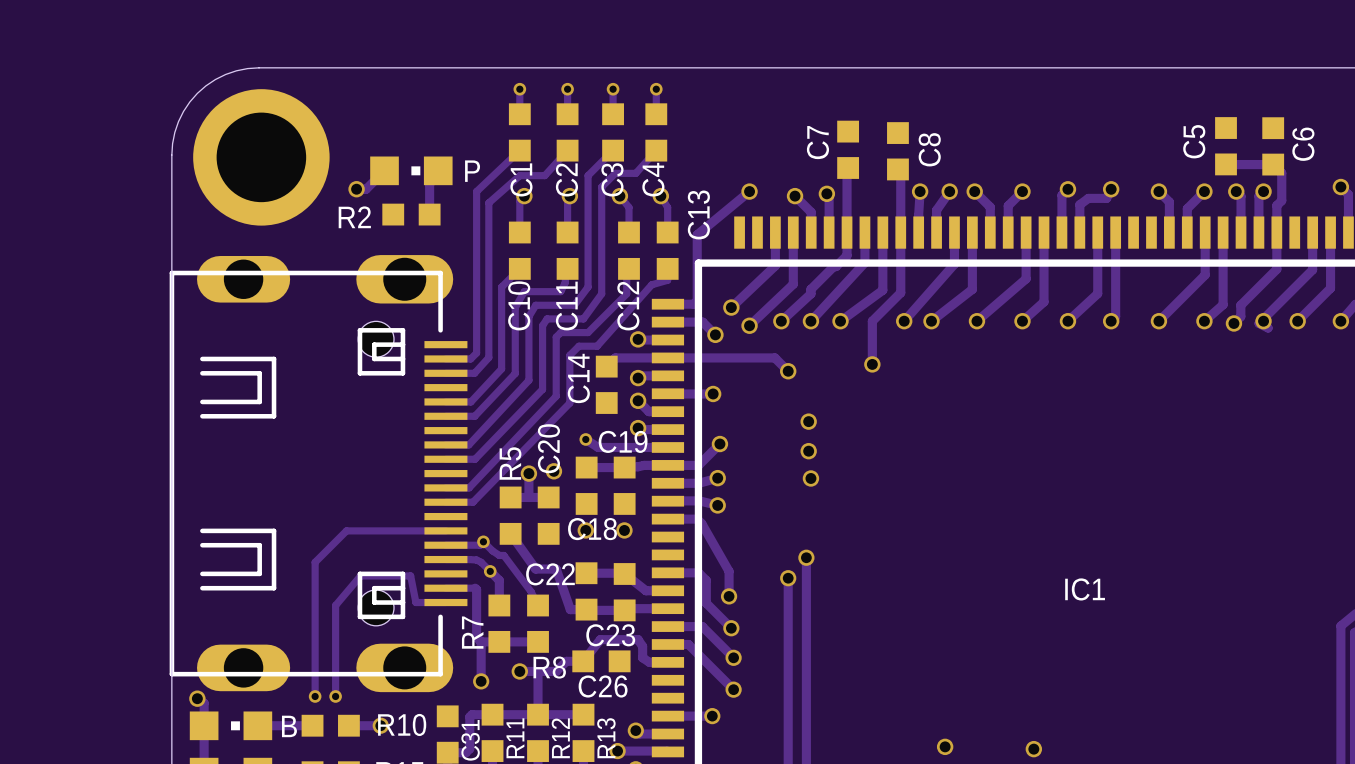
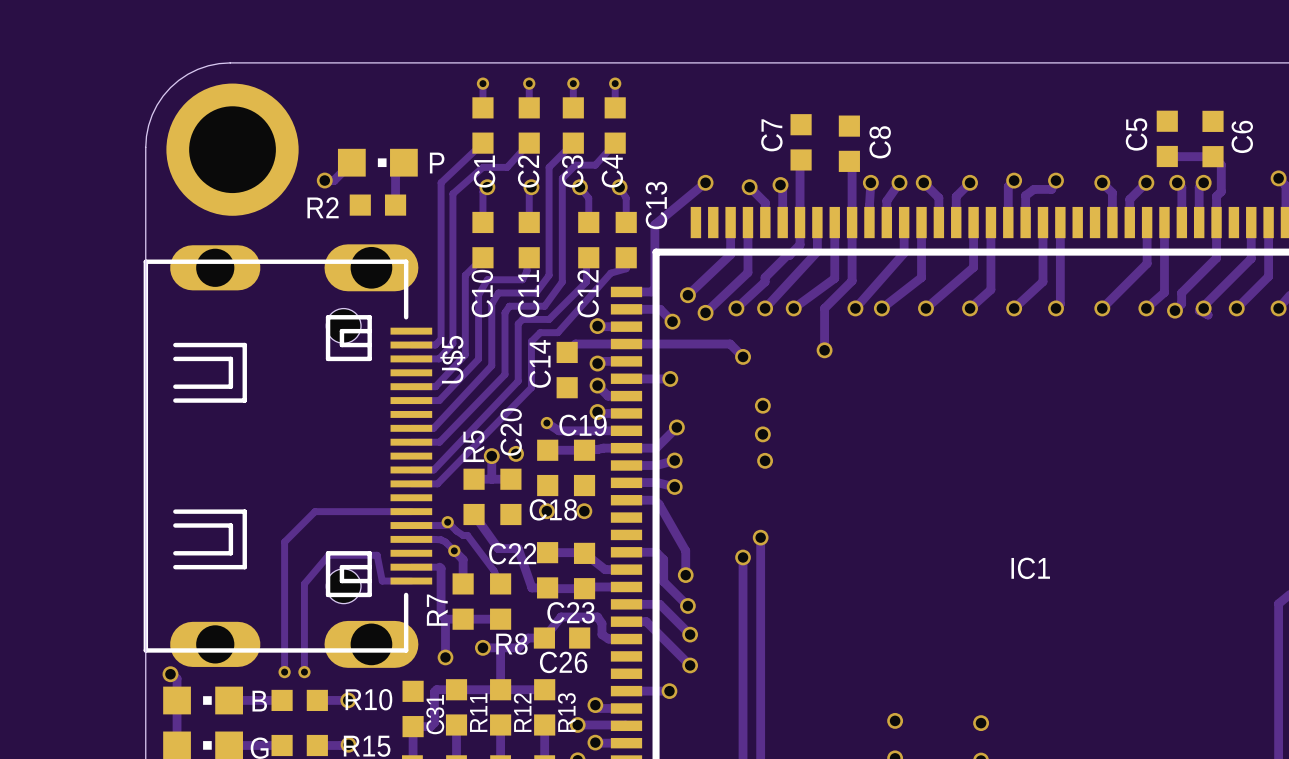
text: none -> U$5 (452, 359)

